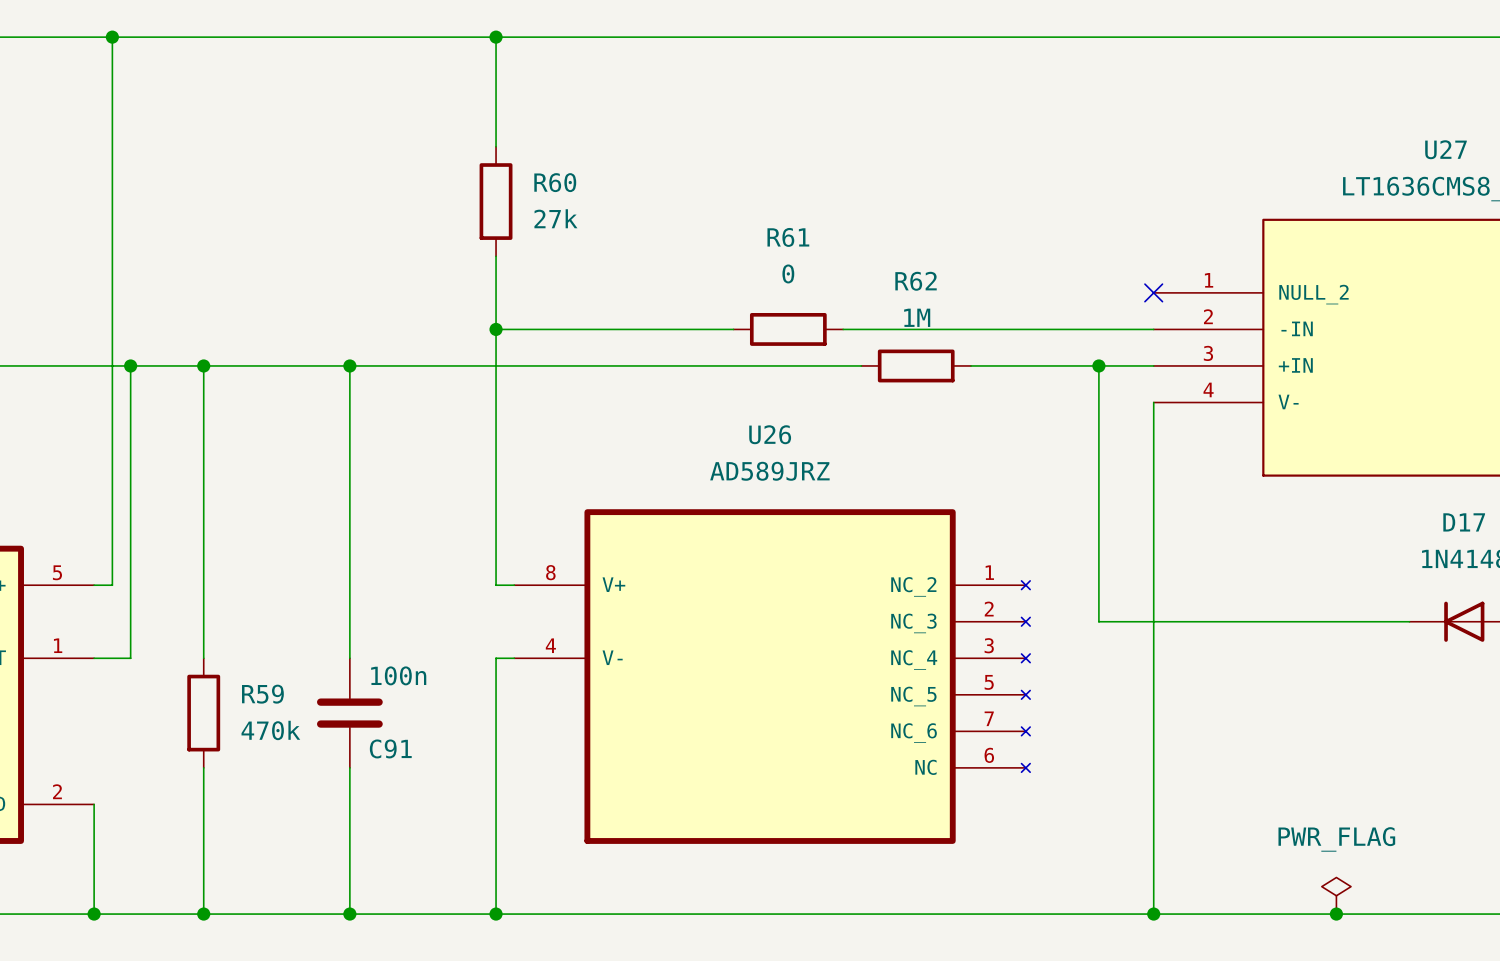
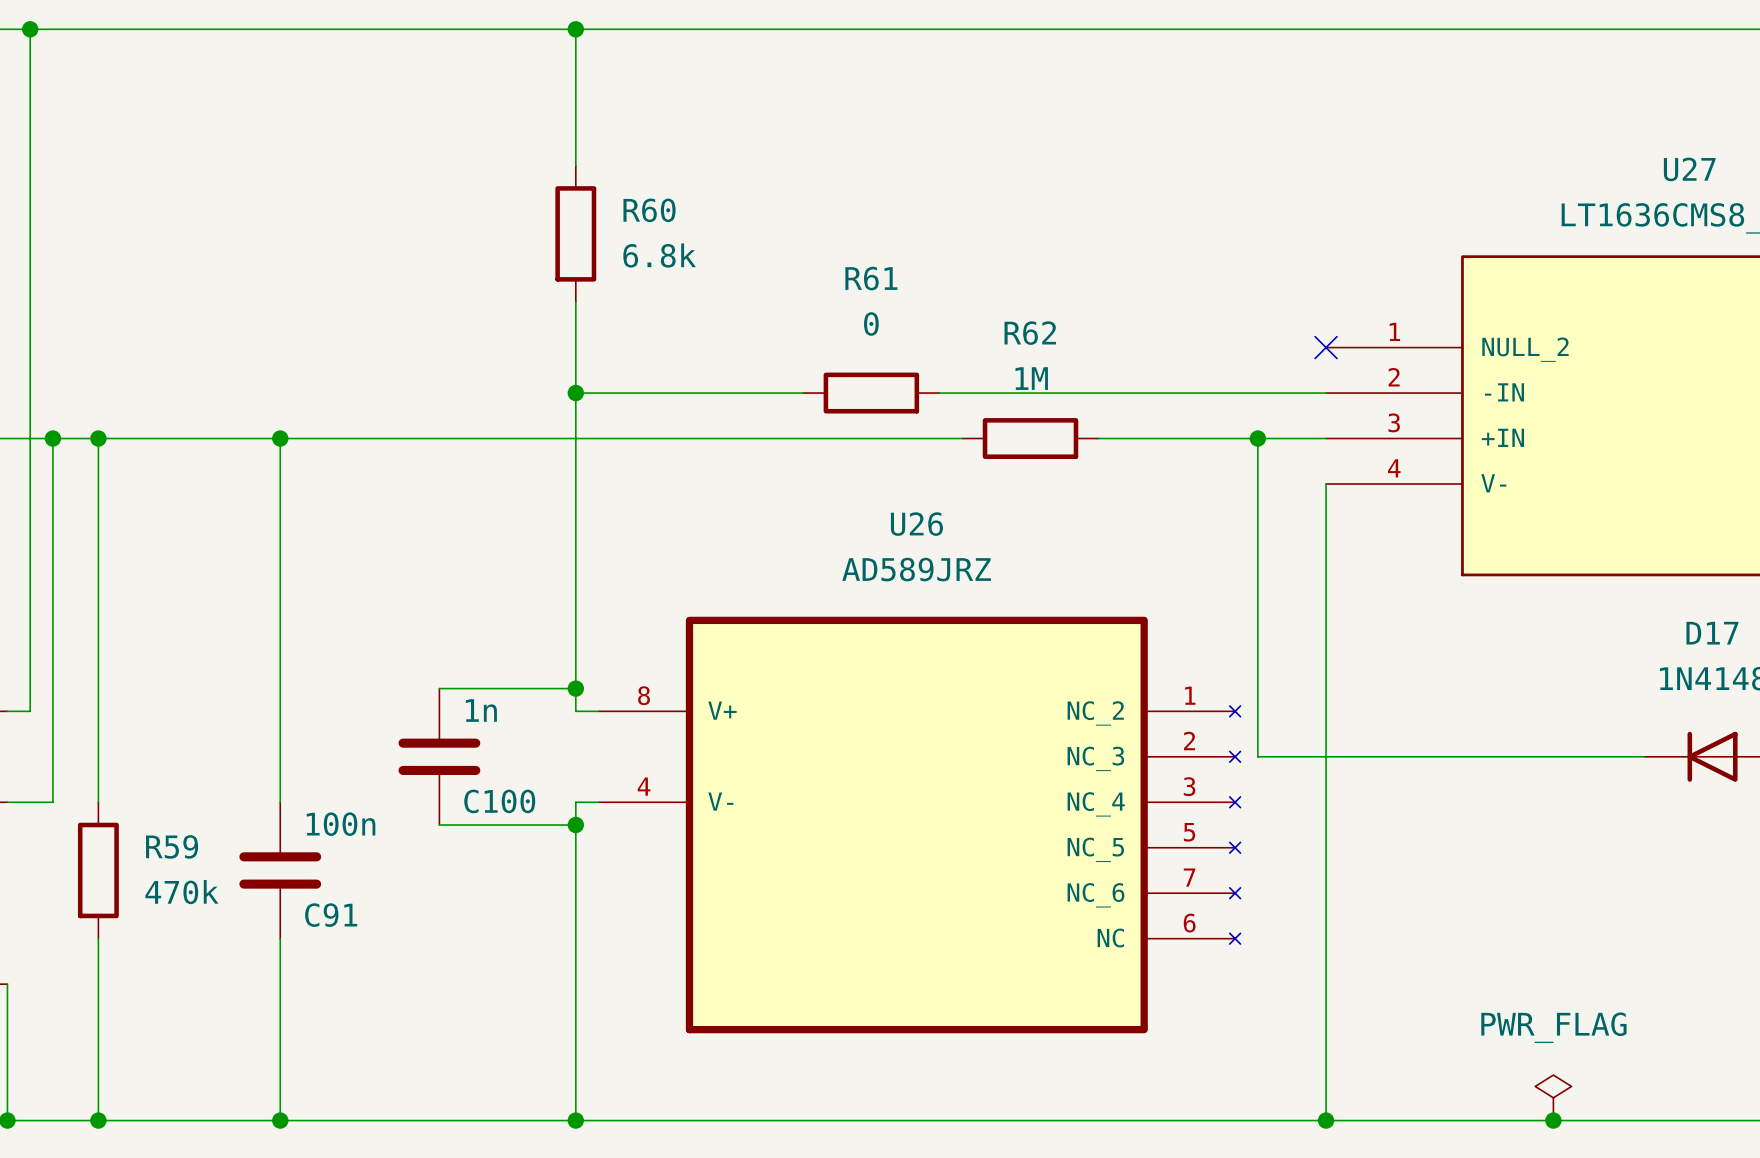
wire: (496, 37) (496, 146) -> (575, 29) (575, 165)
junction position: (496, 37) -> (575, 29)
R60 position: (496, 201) -> (575, 233)
R60 value: 27k (555, 218) -> 6.8k (659, 255)
wire: (496, 256) (496, 585) (514, 585) -> (575, 302) (575, 711) (598, 711)
wire: (496, 329) (550, 329) -> none
junction position: (496, 329) -> (575, 393)
wire: (203, 365) (203, 658) -> (98, 438) (98, 802)
junction position: (203, 365) -> (98, 438)
wire: (349, 365) (349, 658) -> (280, 438) (280, 802)
junction position: (349, 365) -> (280, 438)
wire: none -> (439, 688) (575, 688)
junction: none -> (575, 688)
C100: none -> 1n (439, 756)
wire: (514, 658) (496, 658) (496, 914) -> (598, 802) (575, 802) (575, 1120)
wire: none -> (439, 825) (575, 825)
junction: none -> (575, 825)
U26 position: (772, 676) -> (919, 825)
R59 position: (203, 713) -> (98, 870)
C91 position: (349, 713) -> (280, 870)
wire: (203, 767) (203, 914) -> (98, 938) (98, 1120)
wire: (349, 767) (349, 914) -> (280, 938) (280, 1120)
junction position: (203, 914) -> (98, 1120)
junction position: (349, 914) -> (280, 1120)
junction position: (496, 914) -> (575, 1120)

